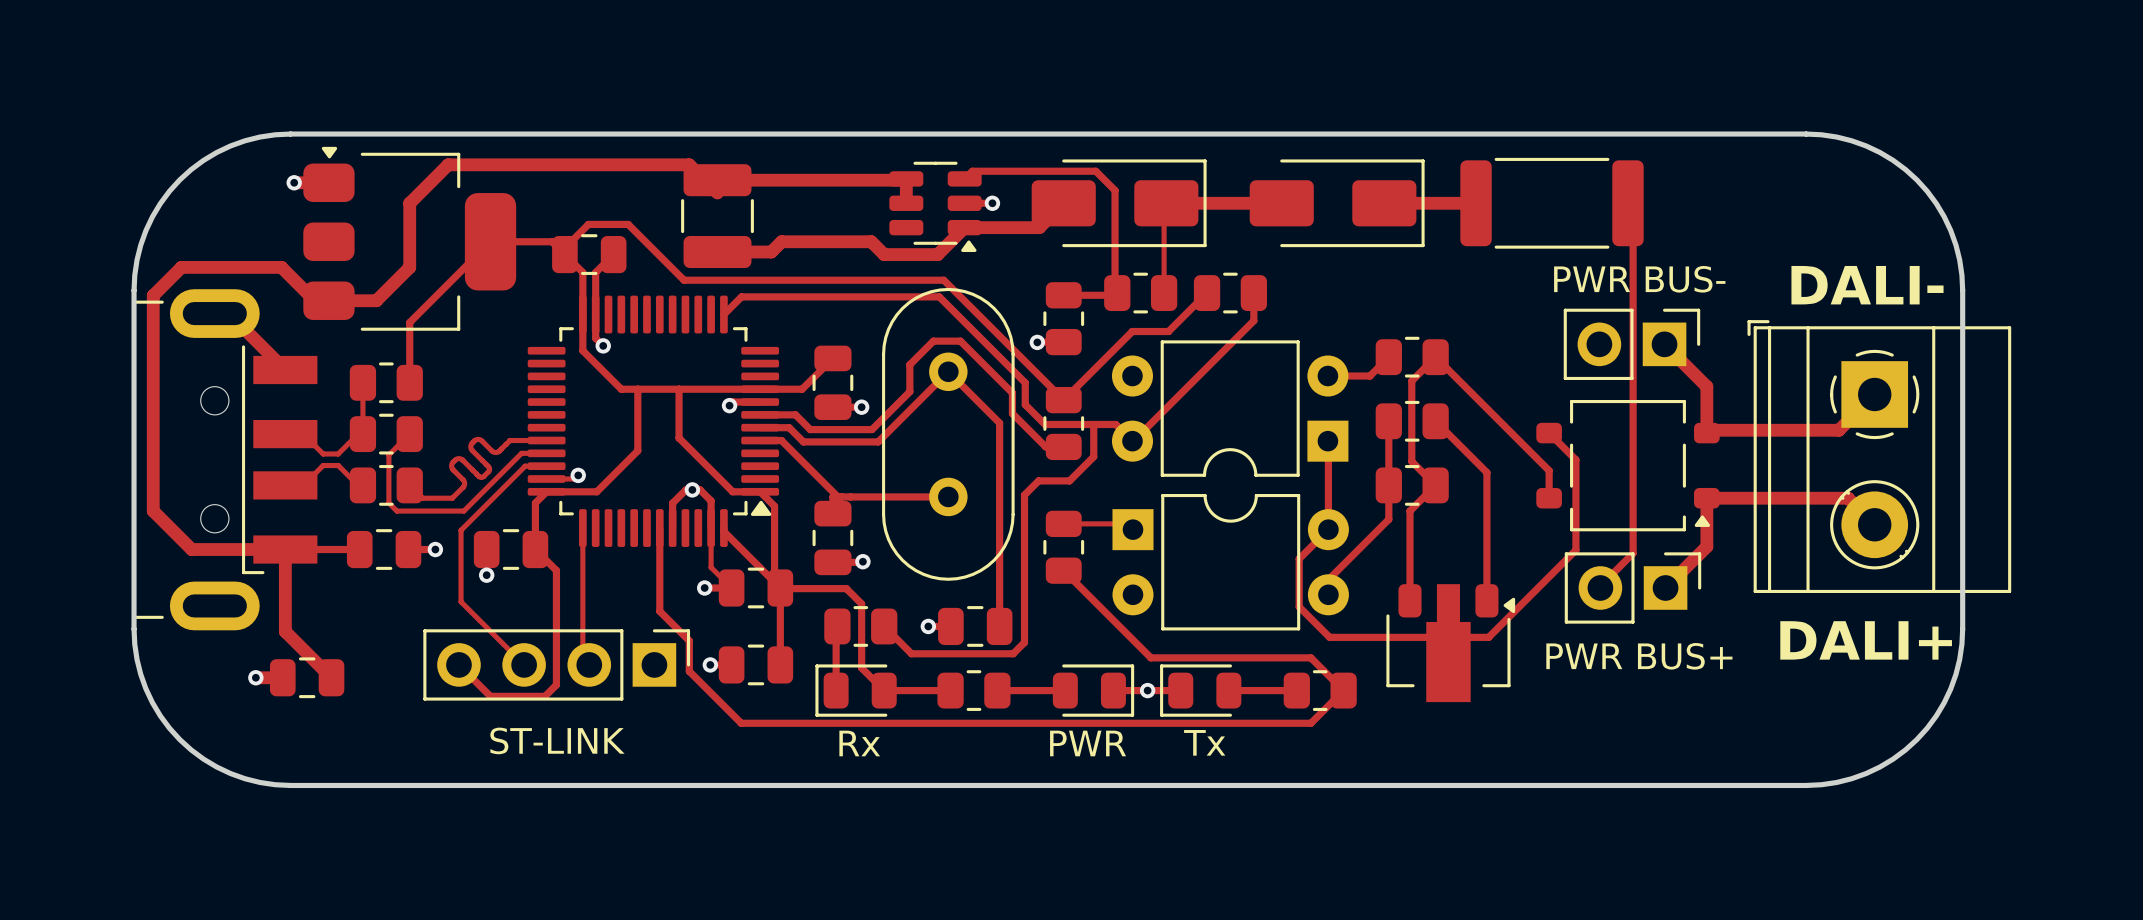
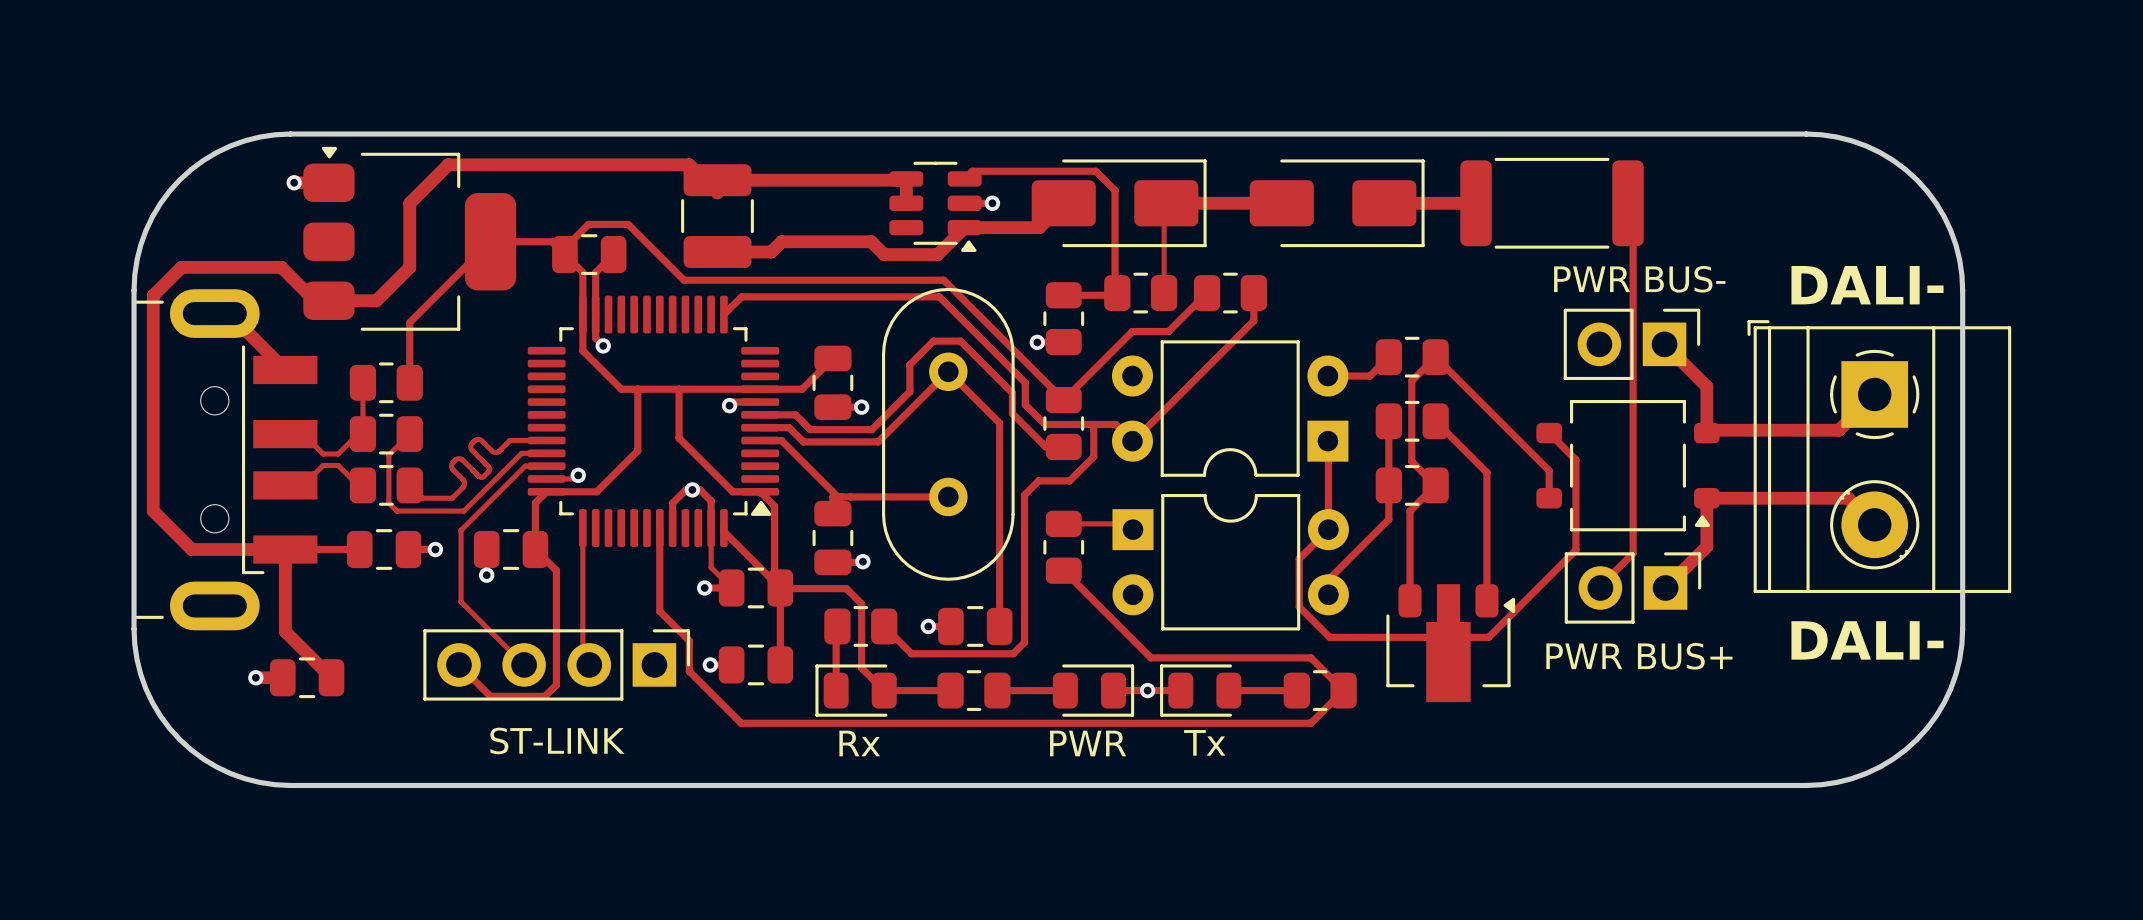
text: DALI+ (1866, 640) -> DALI- (1867, 640)

